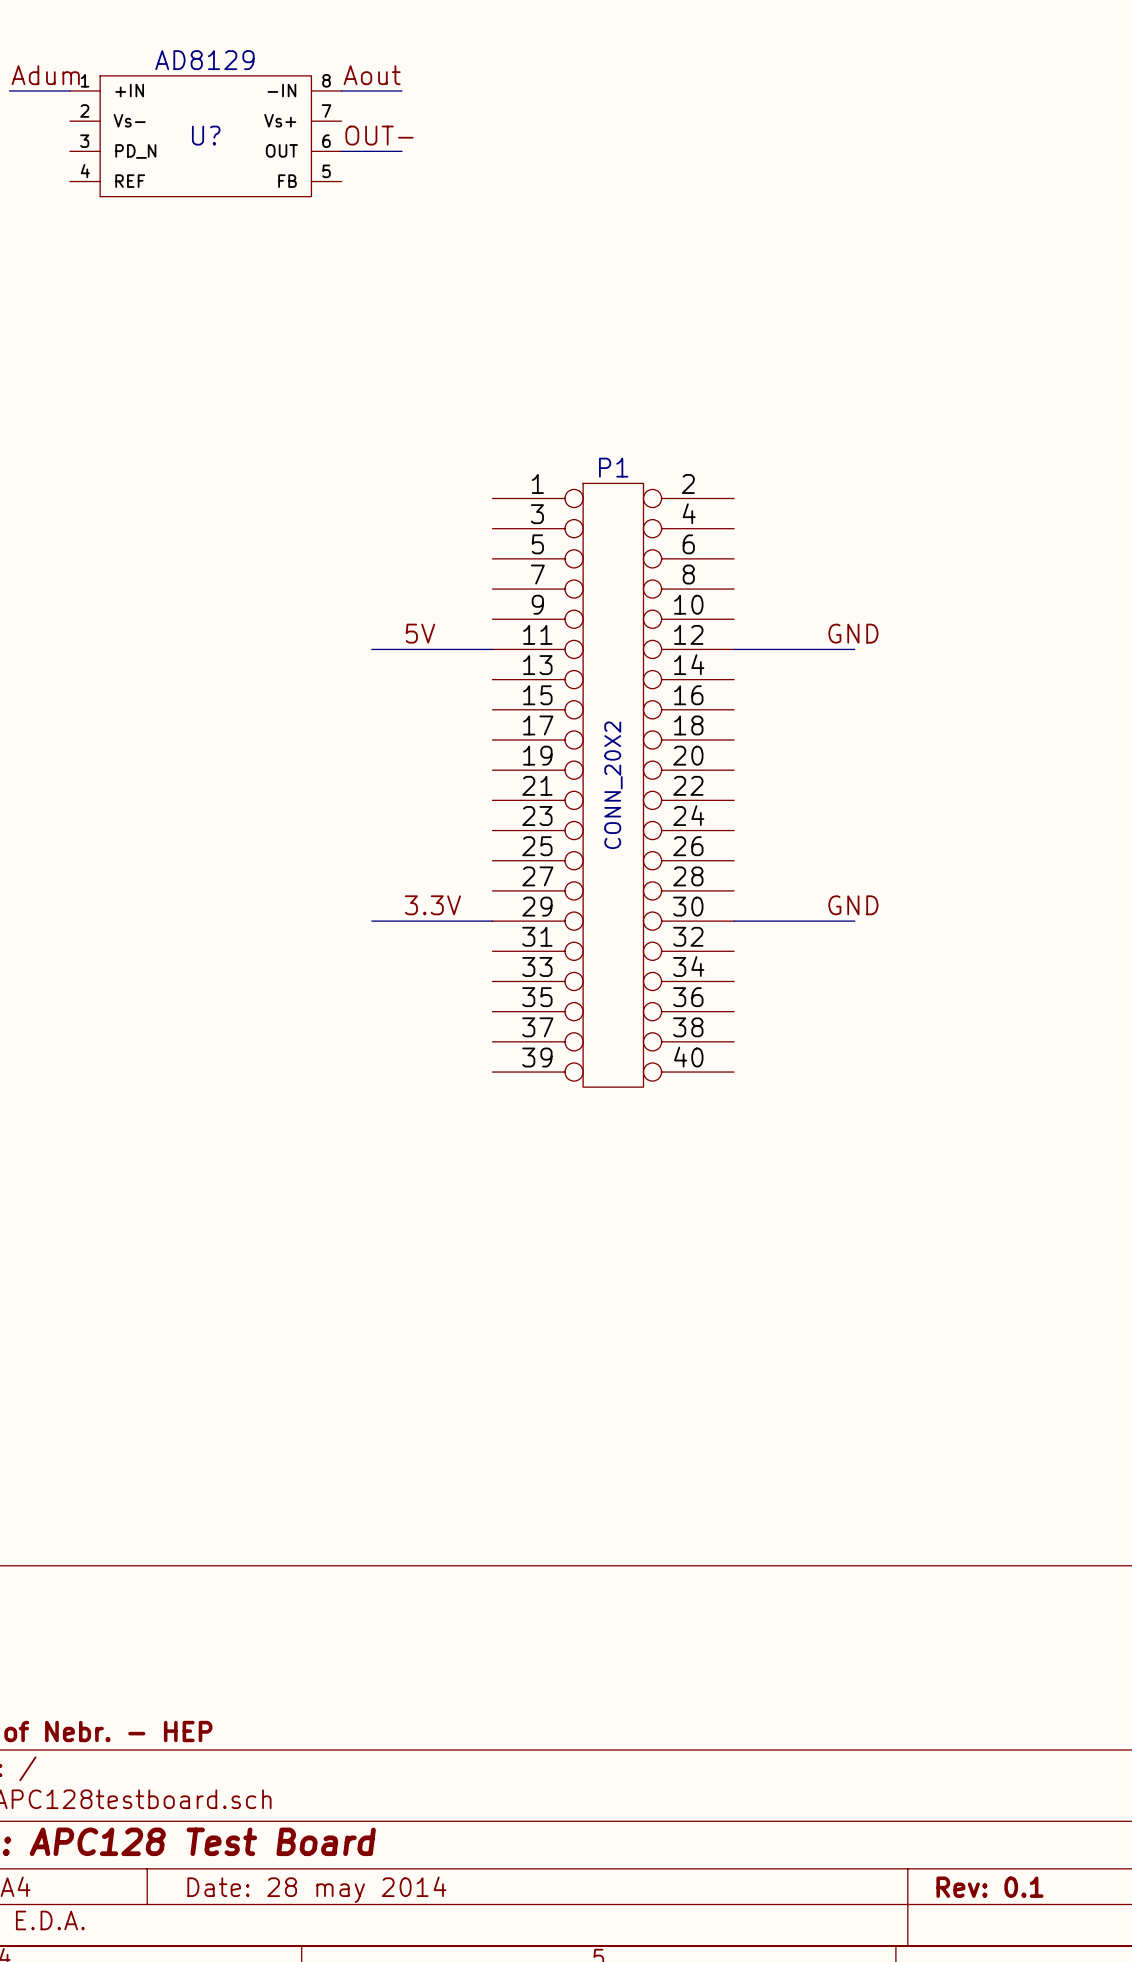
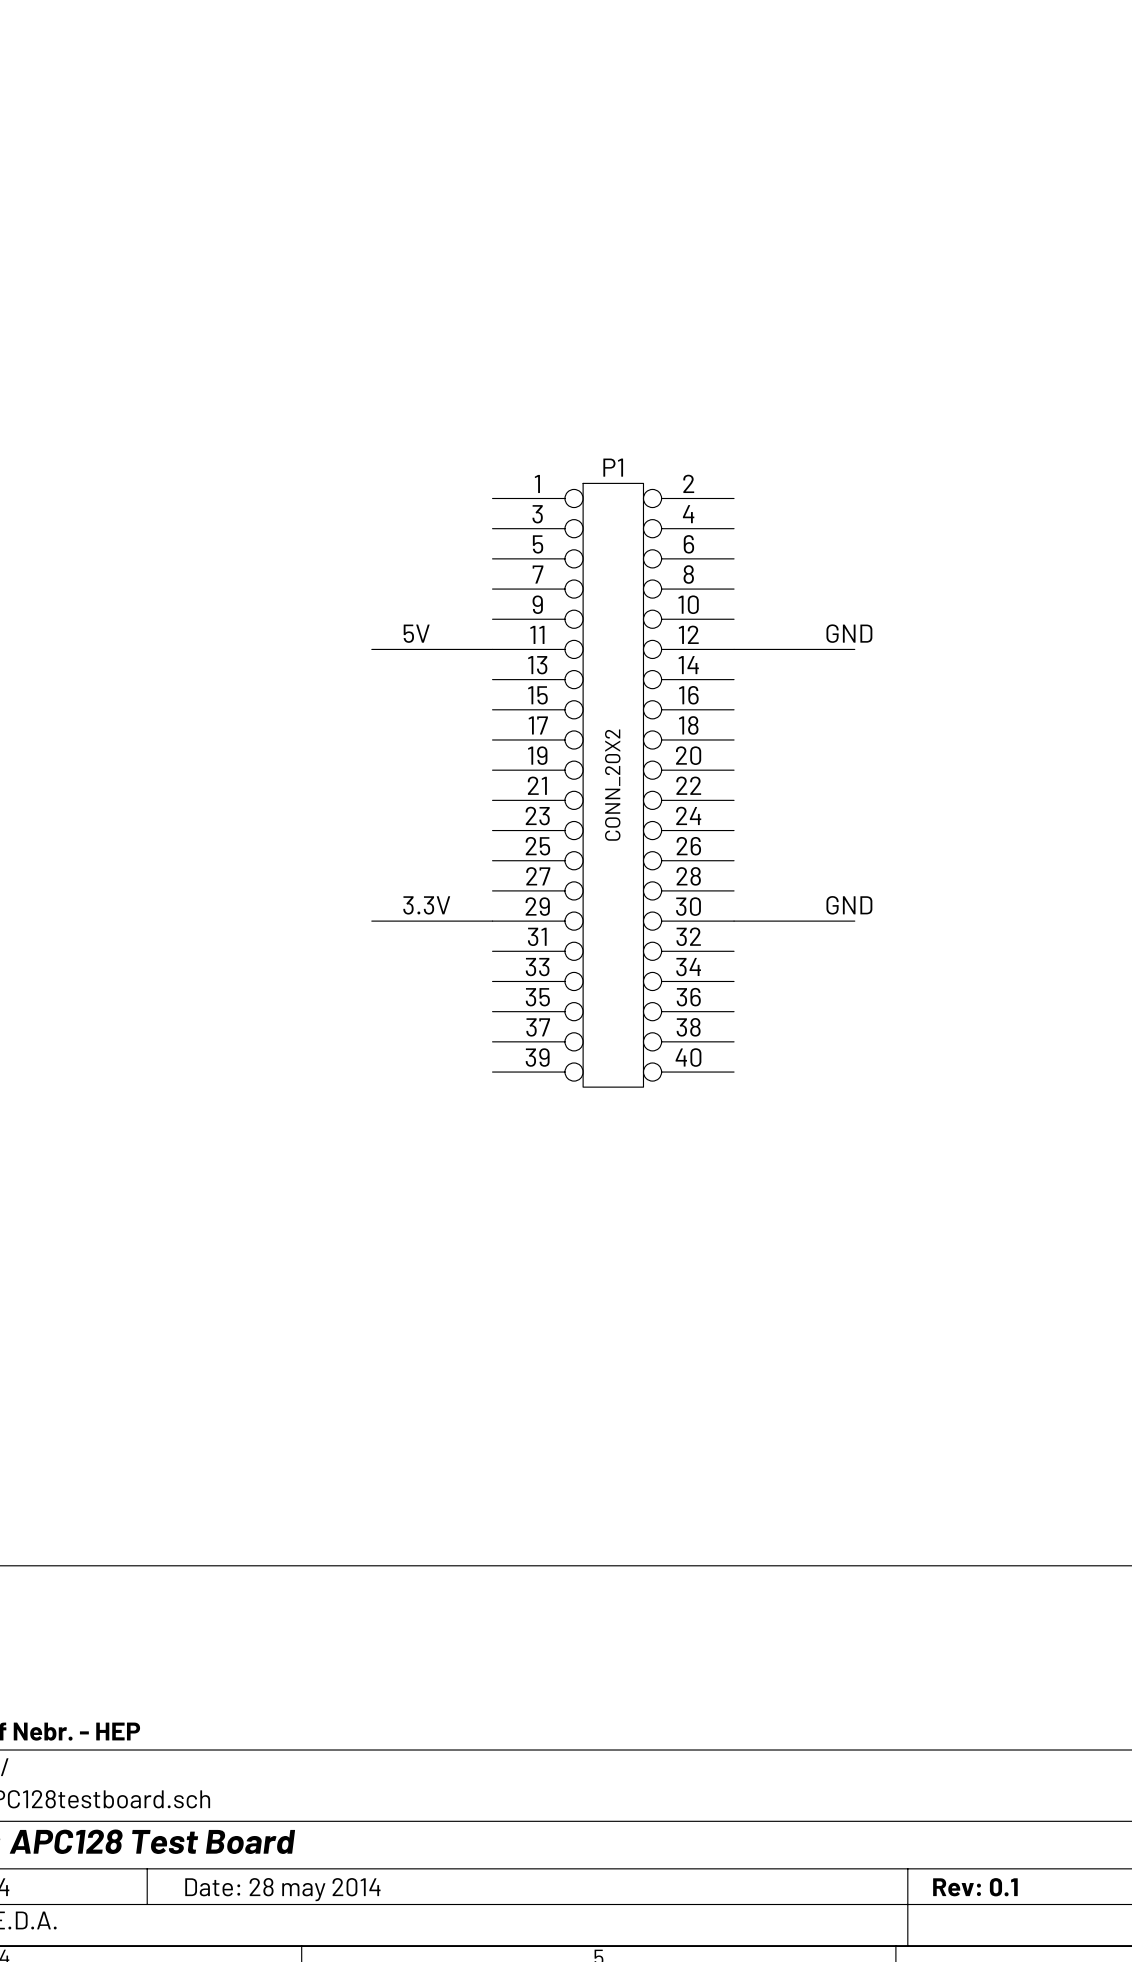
label: Adum (45, 75) -> none
label: Aout (372, 75) -> none
wire: (9, 90) (69, 90) -> none
wire: (341, 90) (401, 90) -> none
label: OUT- (379, 135) -> none
U?: AD8129 (205, 136) -> none
wire: (341, 151) (401, 151) -> none

